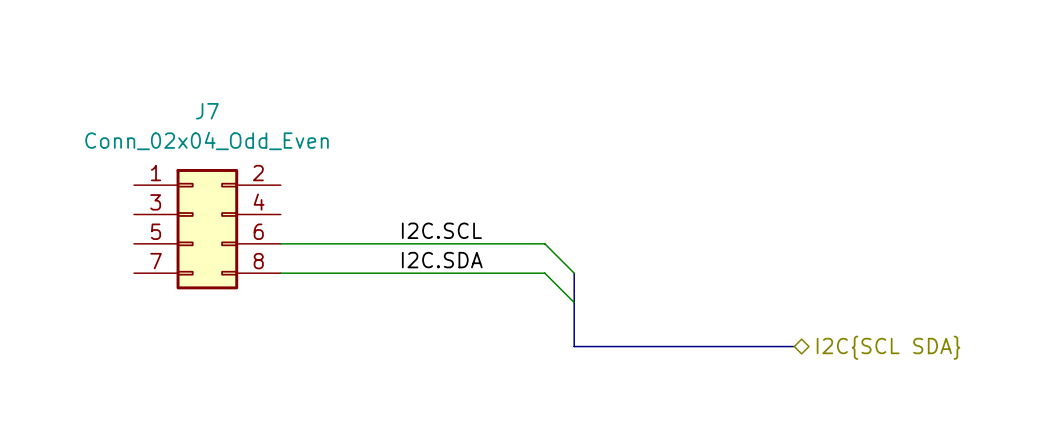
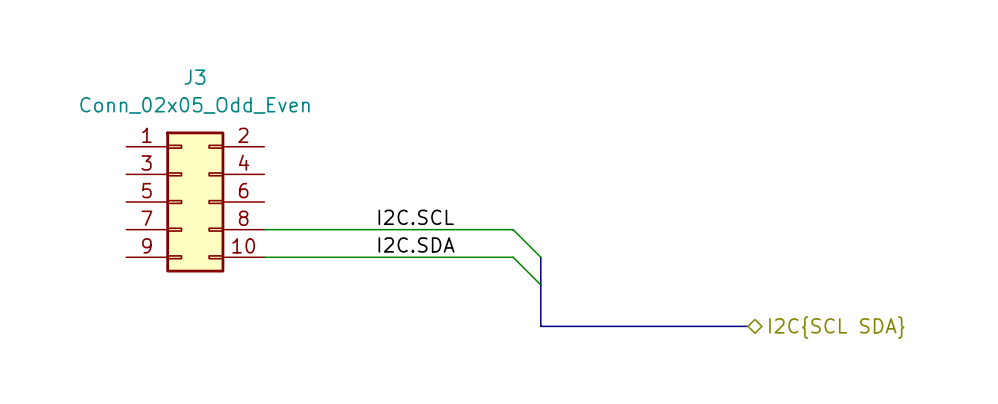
J3: none -> Conn_02x05_Odd_Even (195, 202)
J7: Conn_02x04_Odd_Even (207, 229) -> none

